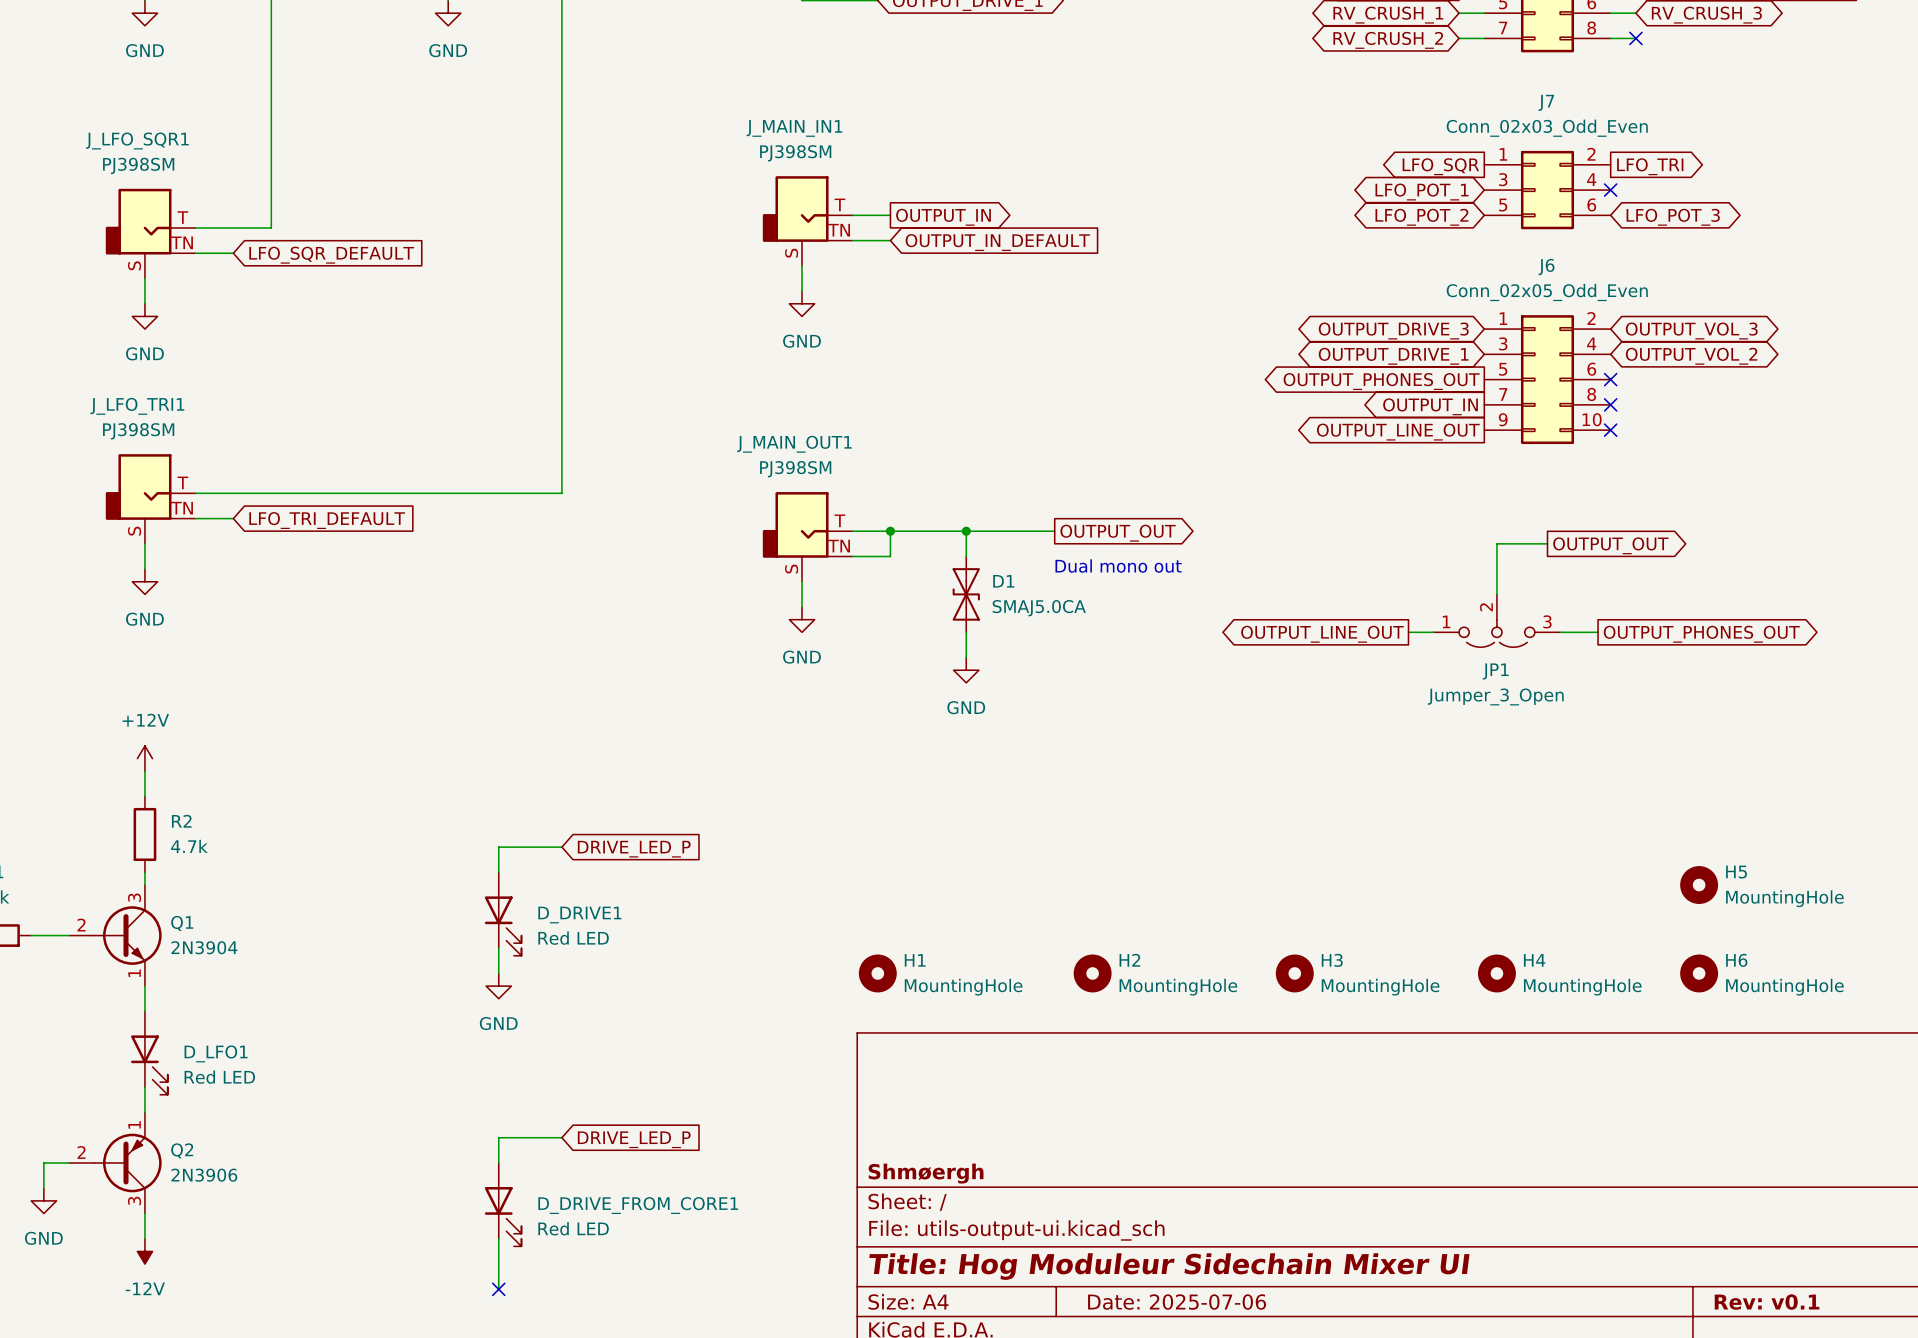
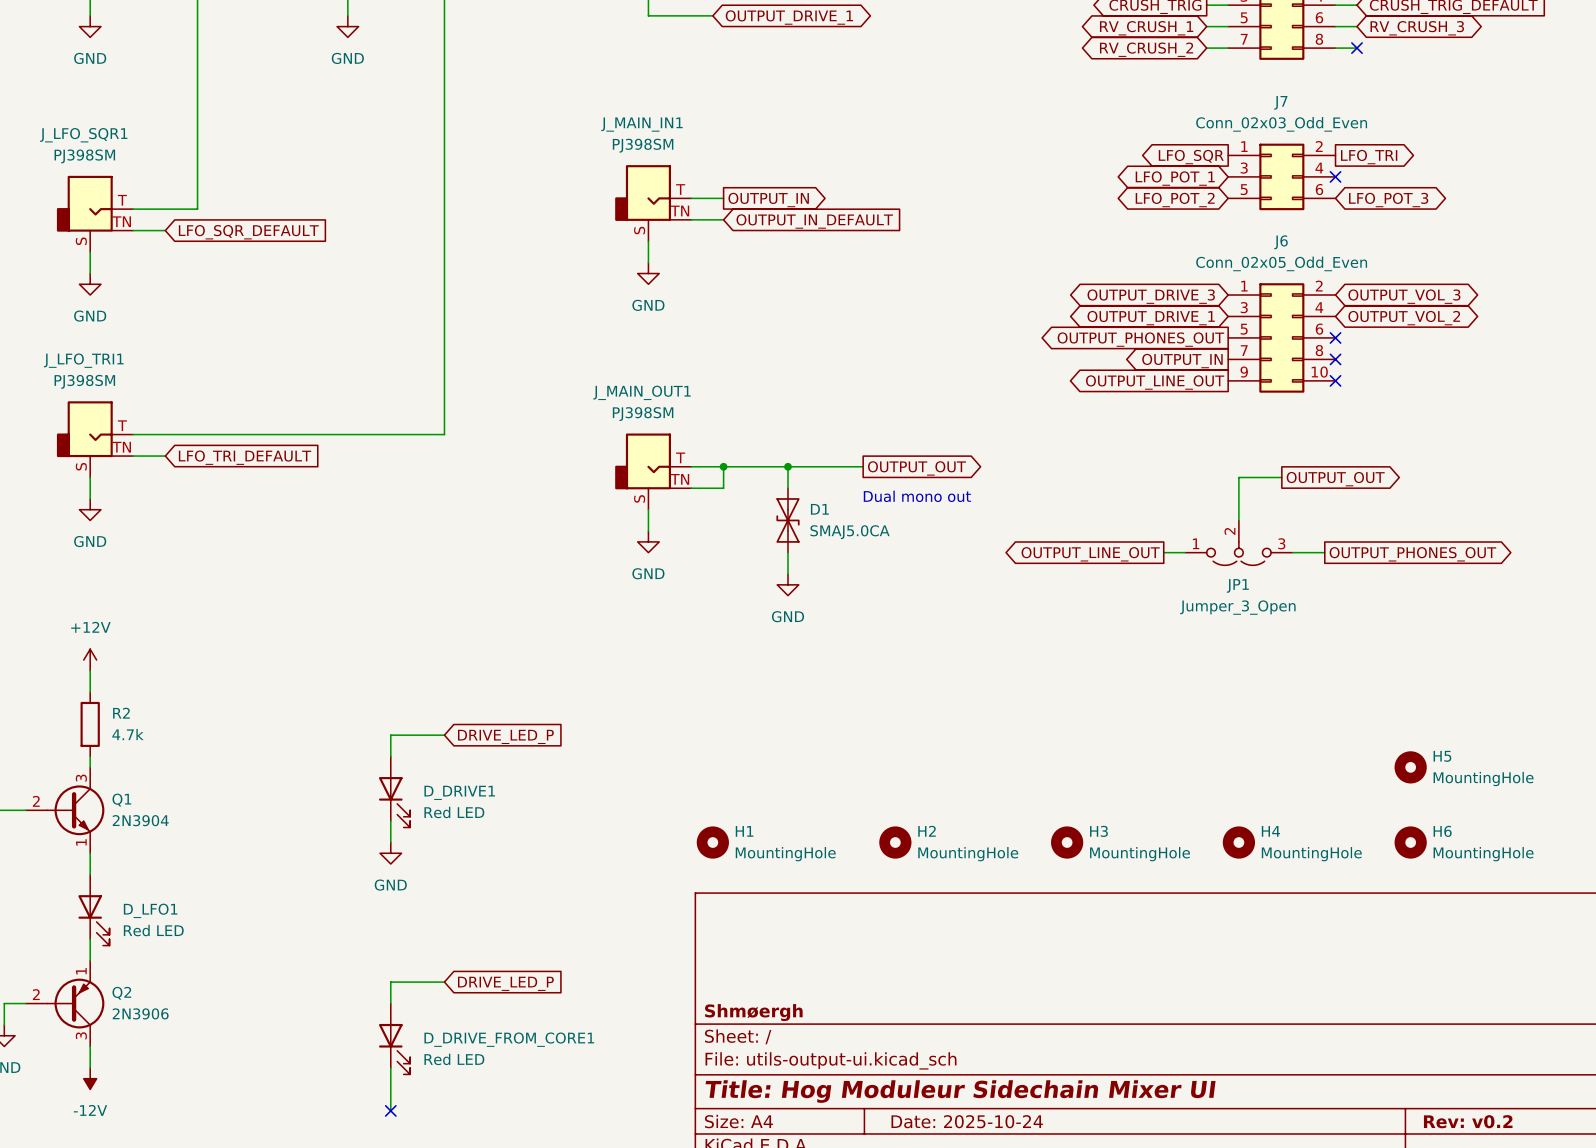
title block: Date: 2025-07-06 (1177, 1302) -> Date: 2025-10-24 (967, 1121)
title block: Rev: v0.1 (1767, 1302) -> Rev: v0.2 (1468, 1121)

